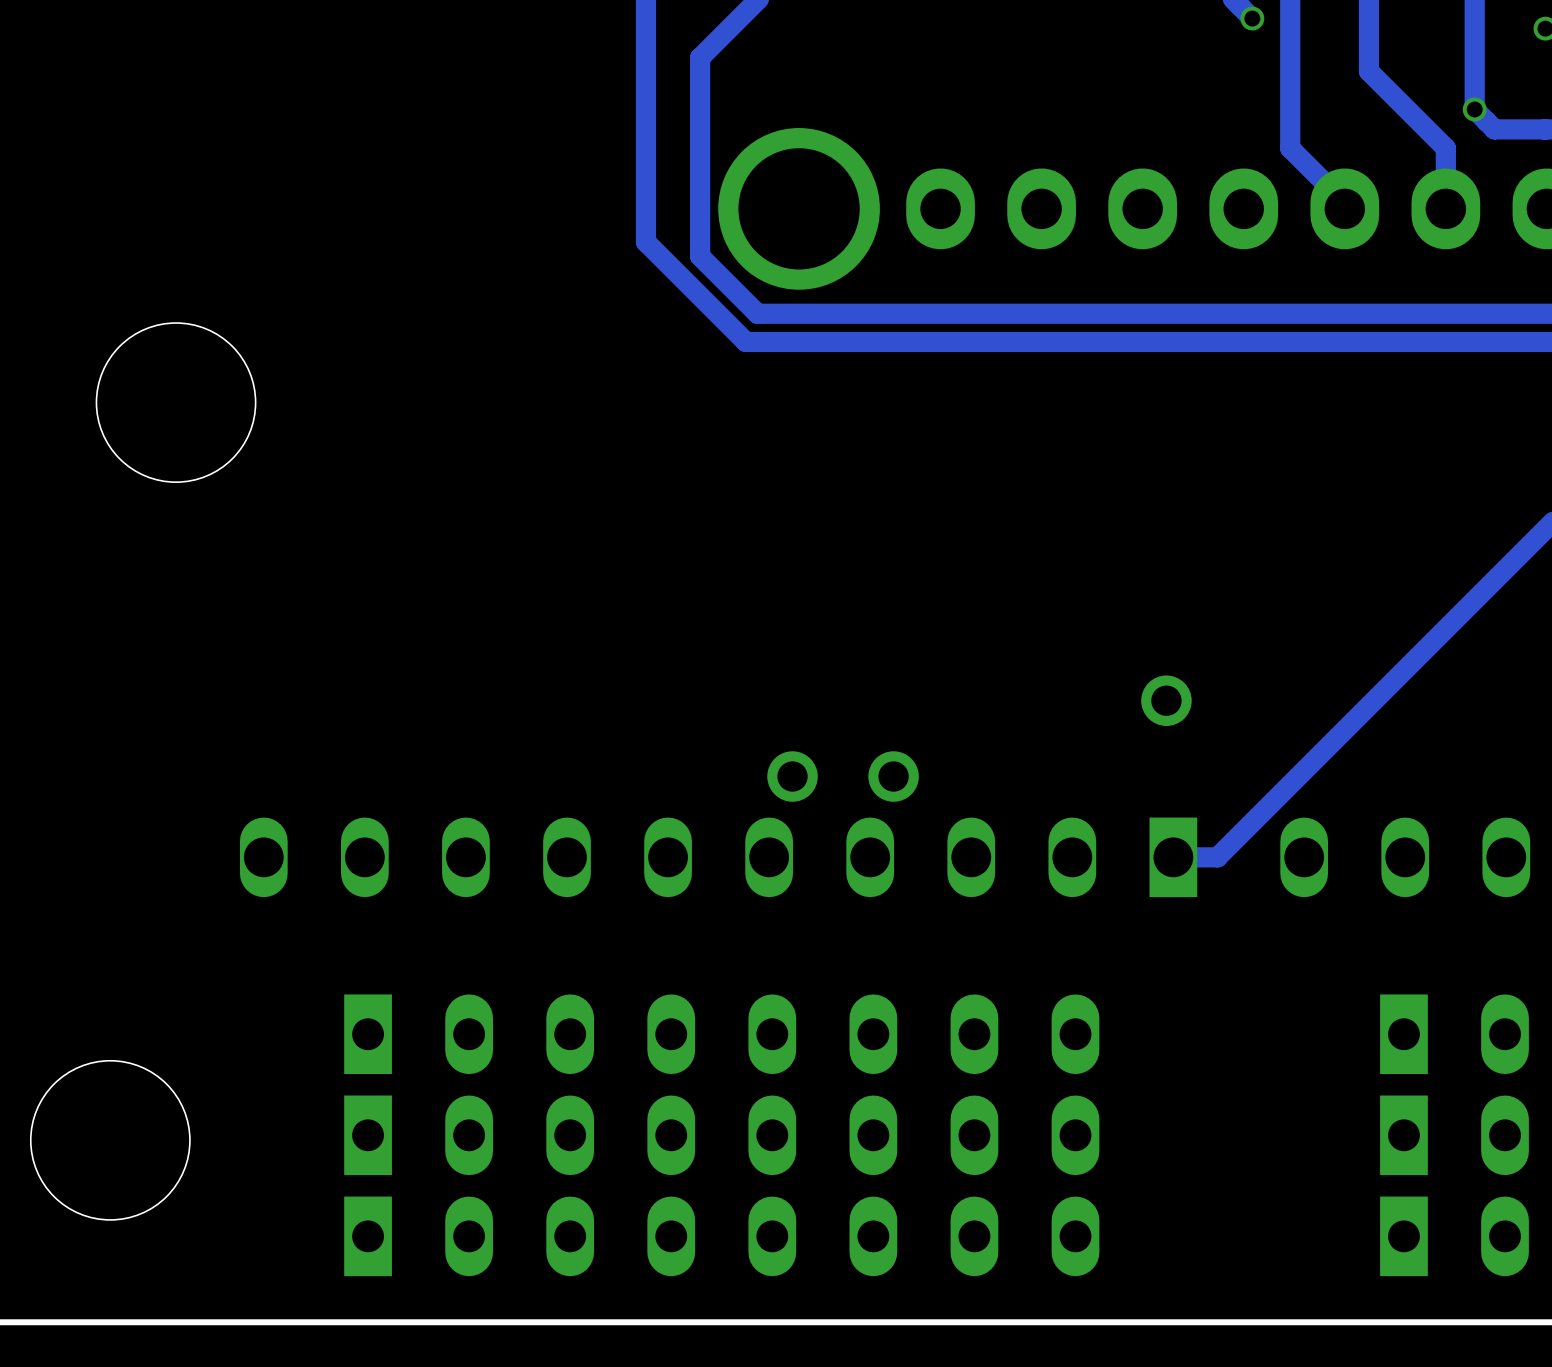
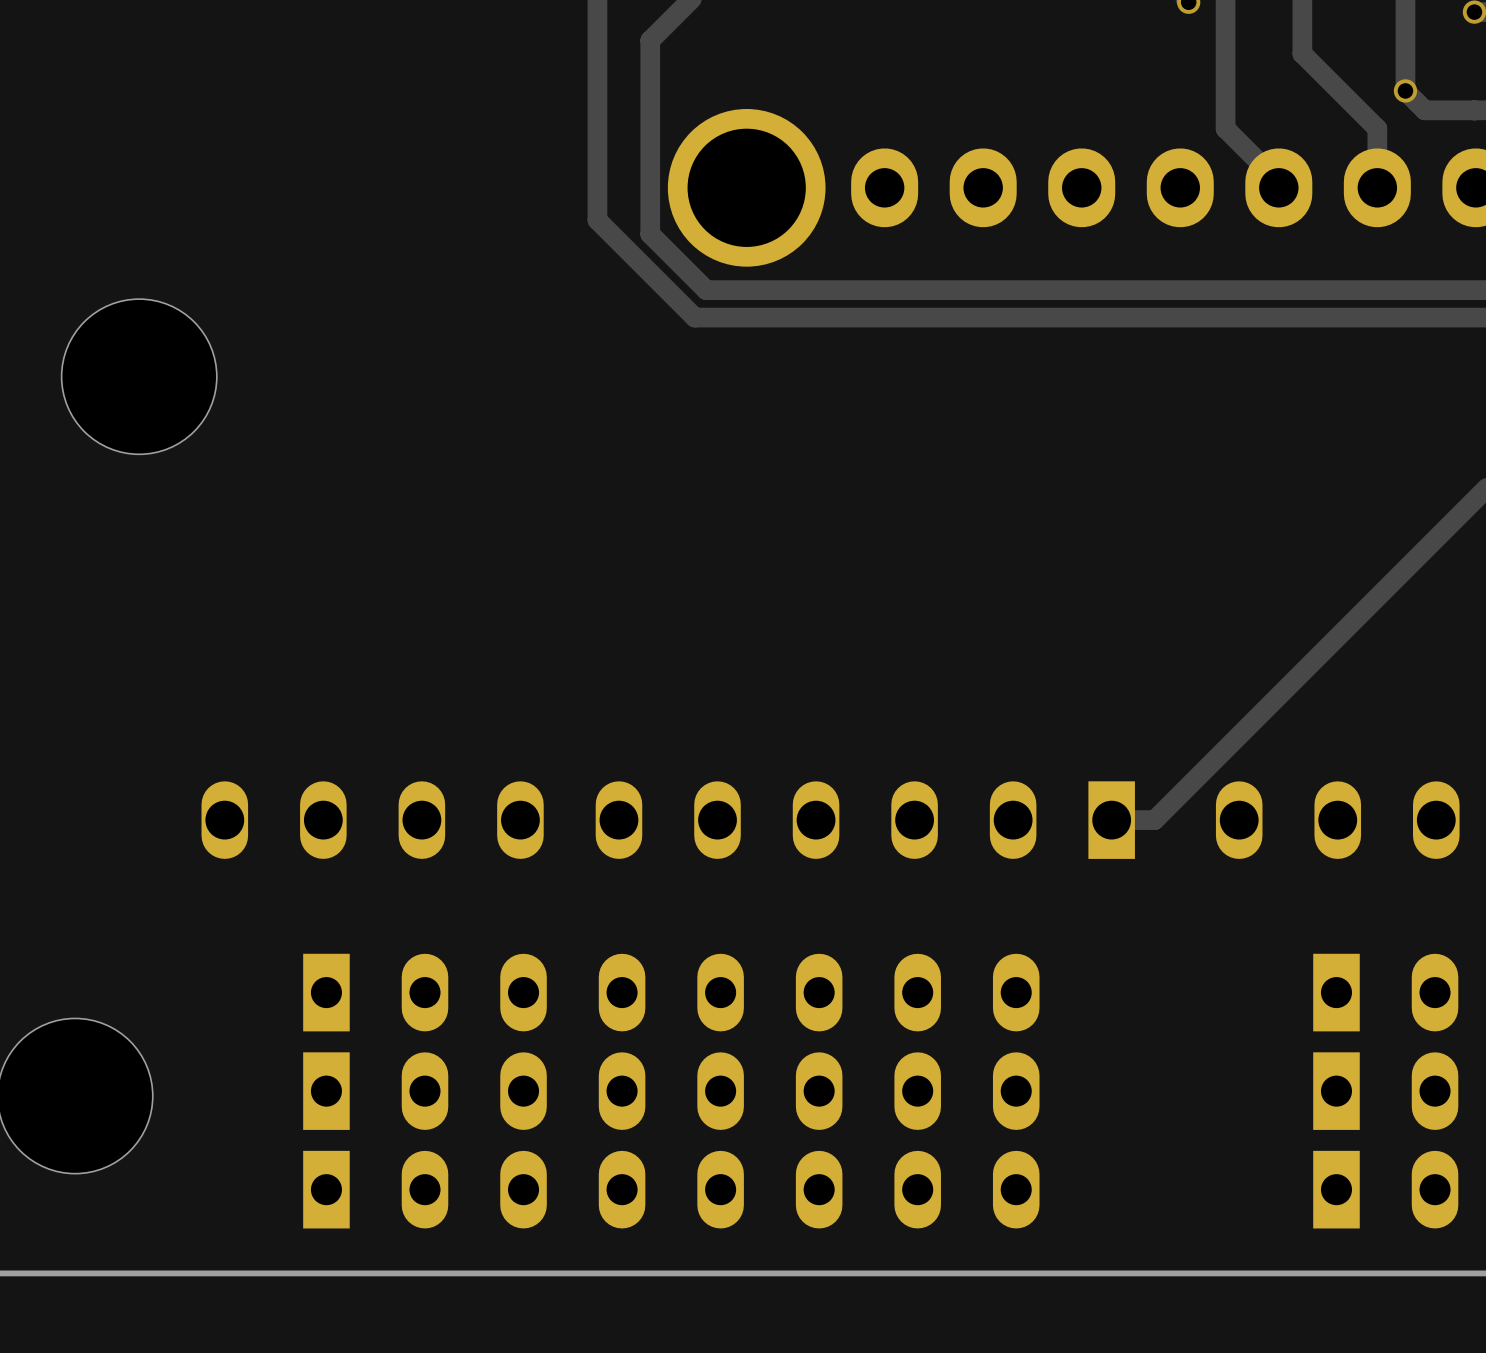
via: (1166, 700) -> none
via: (792, 776) -> none
via: (893, 776) -> none

